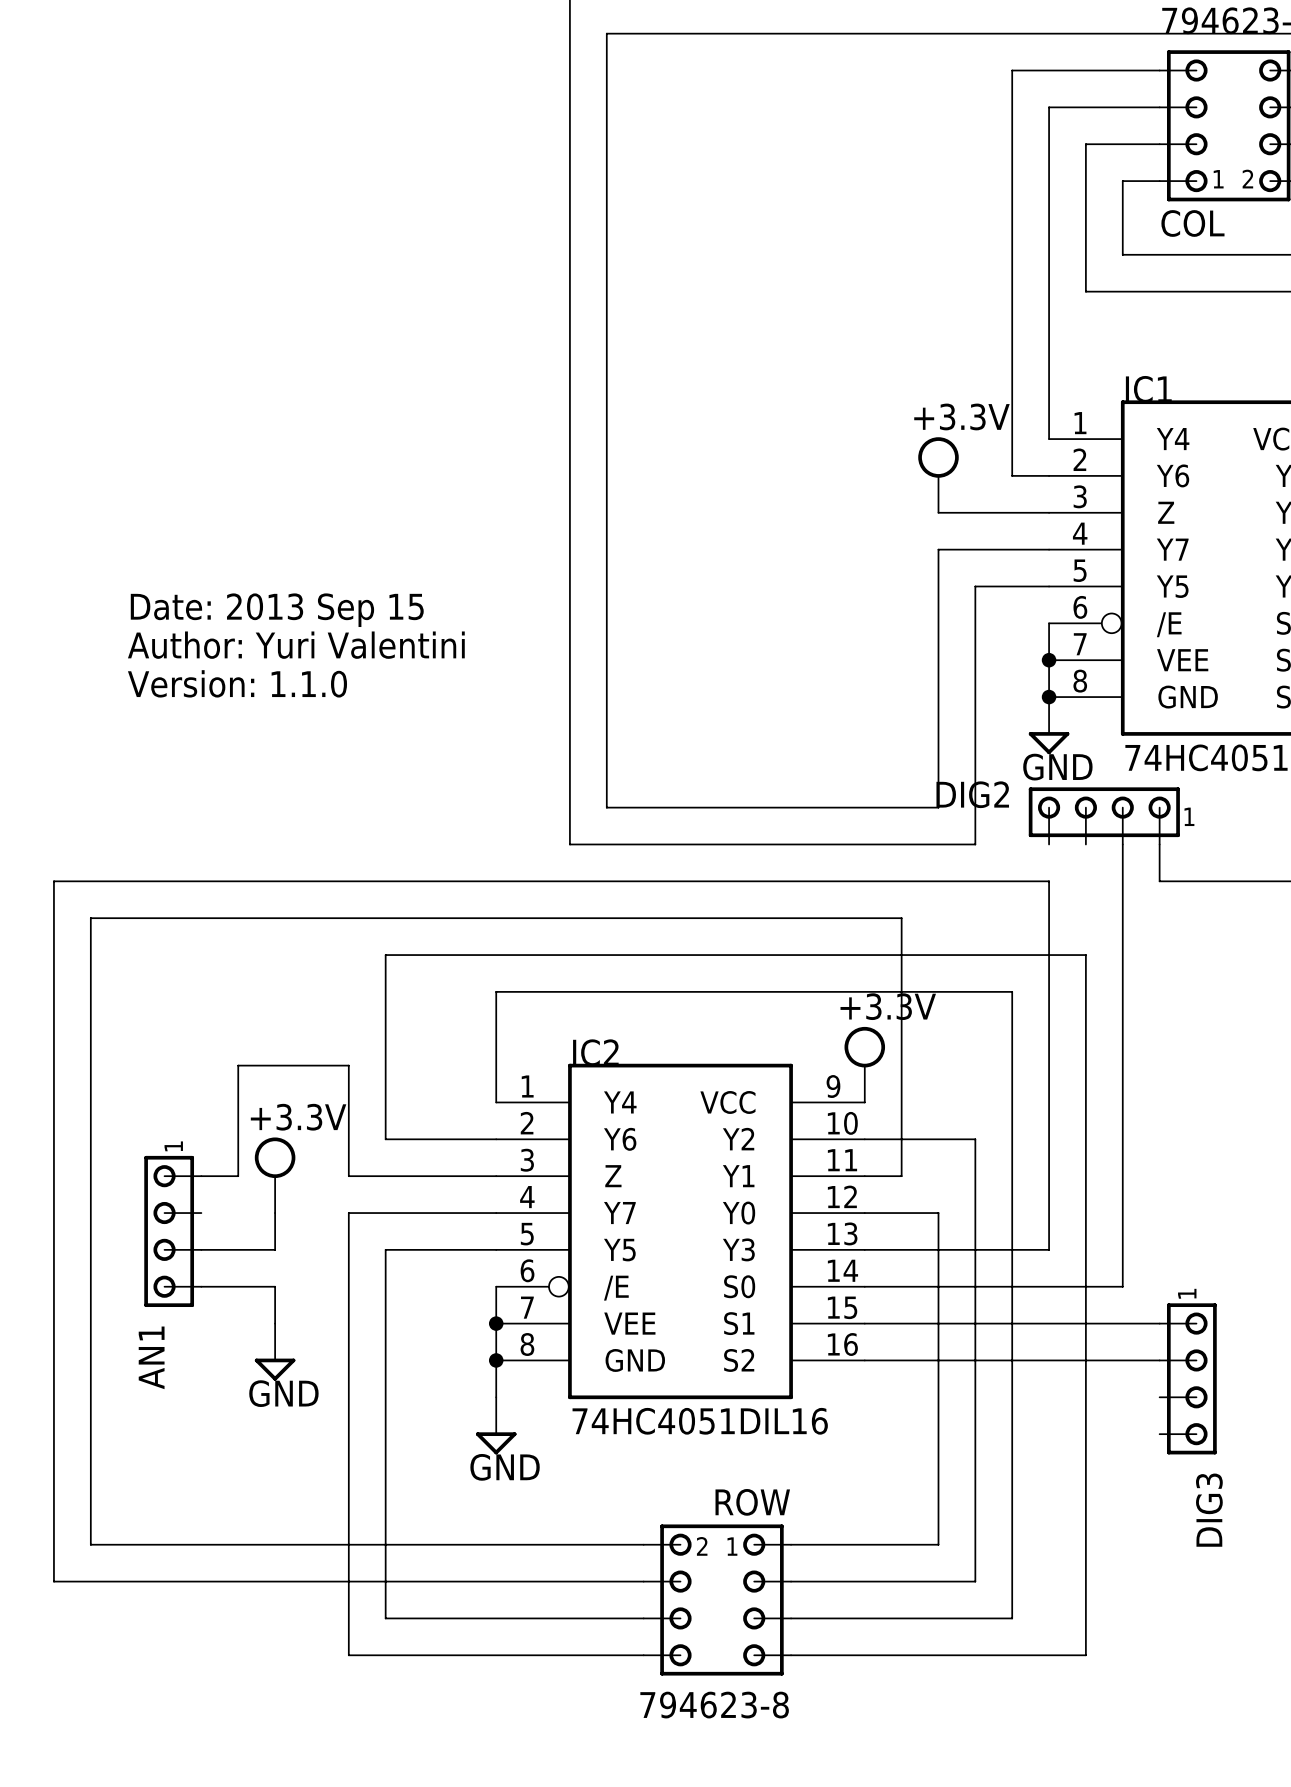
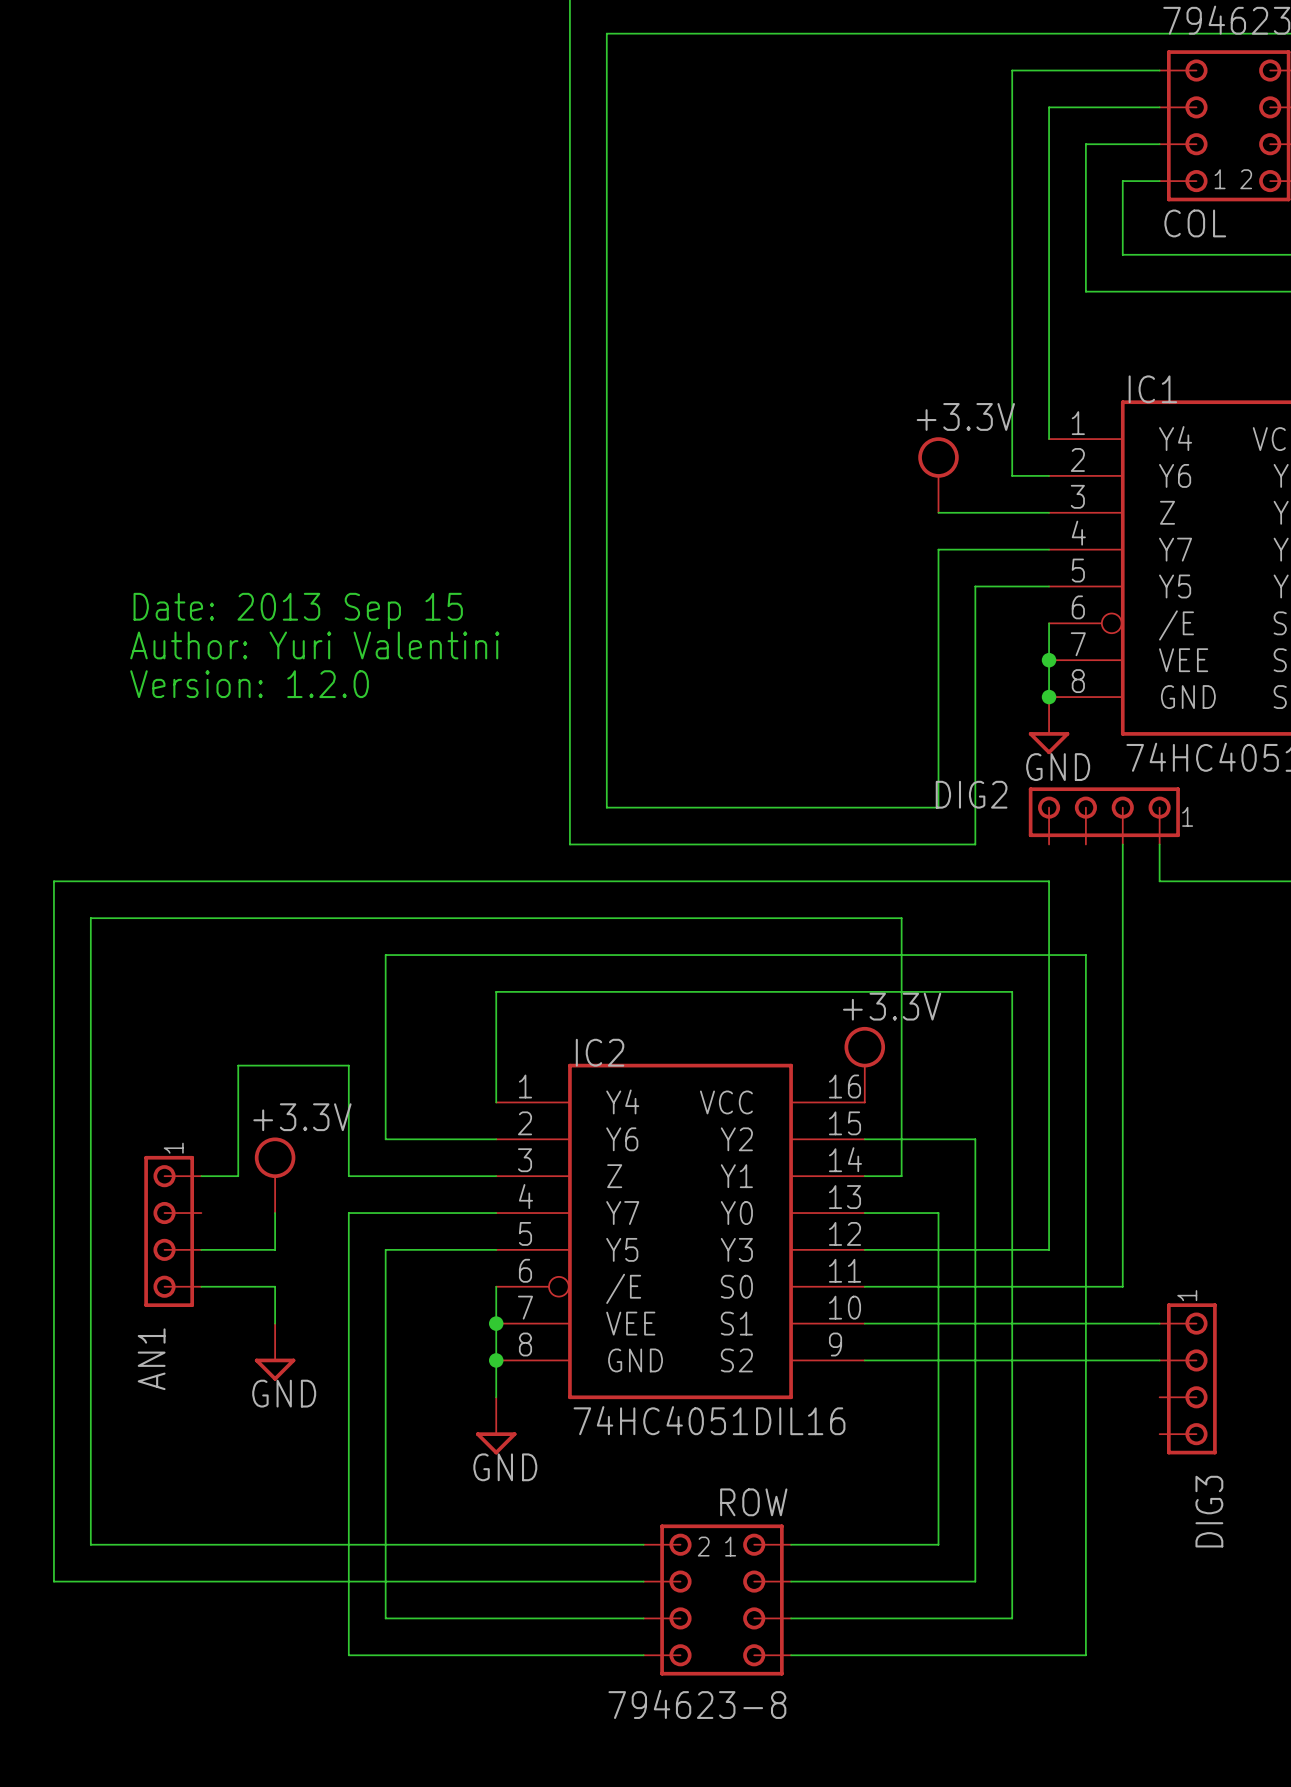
text: Version: 1.1.0 (237, 683) -> Version: 1.2.0 (249, 684)
IC2 pin number: 9 (833, 1086) -> 16 (845, 1086)
IC2 pin number: 10 (842, 1123) -> 15 (845, 1123)
IC2 pin number: 11 (842, 1160) -> 14 (845, 1159)
IC2 pin number: 12 (842, 1196) -> 13 (845, 1197)
IC2 pin number: 13 (842, 1233) -> 12 (845, 1233)
IC2 pin number: 14 (842, 1270) -> 11 (845, 1270)
IC2 pin number: 15 (842, 1307) -> 10 (845, 1307)
IC2 pin number: 16 (842, 1344) -> 9 (835, 1344)

